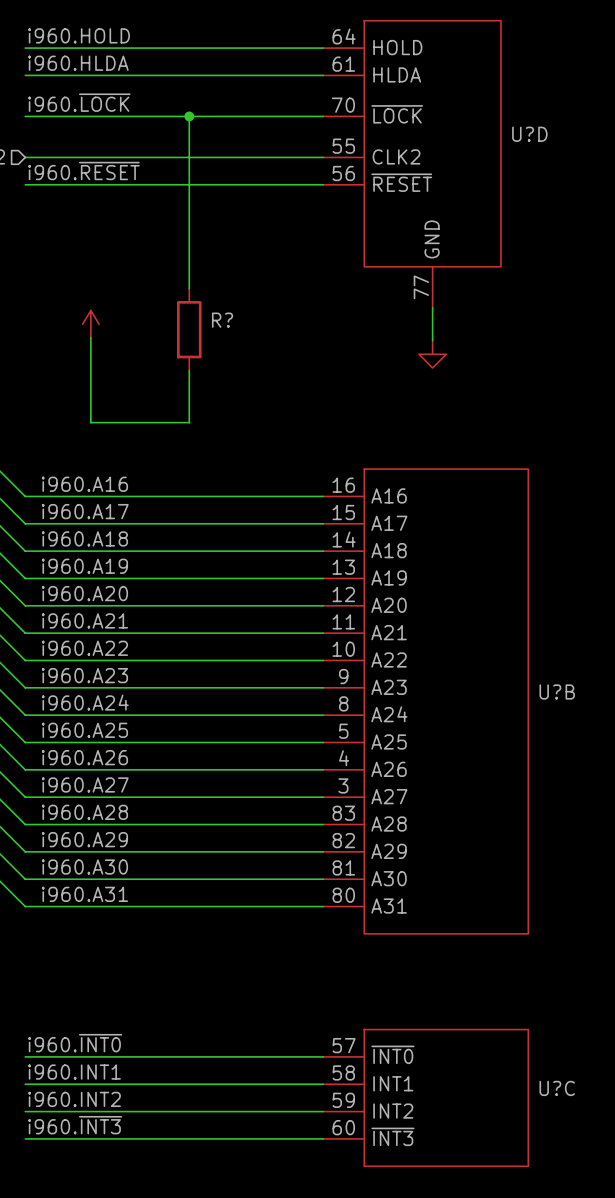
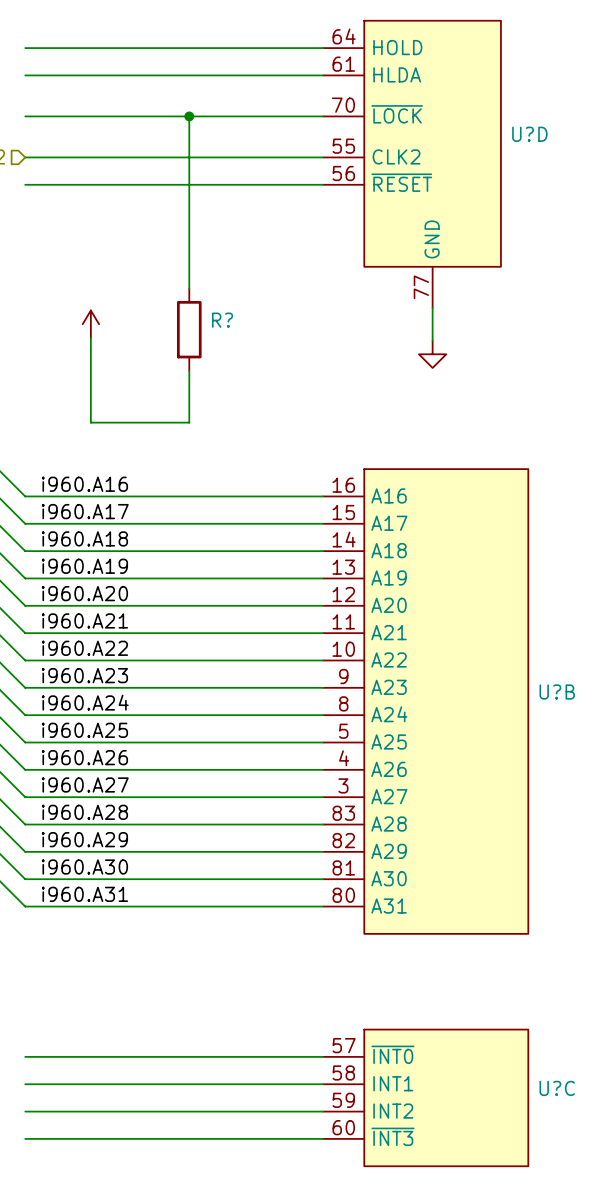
label: i960.HOLD (79, 35) -> none
label: i960.HLDA (78, 63) -> none
label: i960.~{LOCK} (79, 102) -> none
label: i960.~{RESET} (83, 171) -> none
label: i960.~{INT0} (75, 1043) -> none
label: i960.INT1 (74, 1072) -> none
label: i960.INT2 (74, 1099) -> none
label: i960.~{INT3} (75, 1125) -> none

